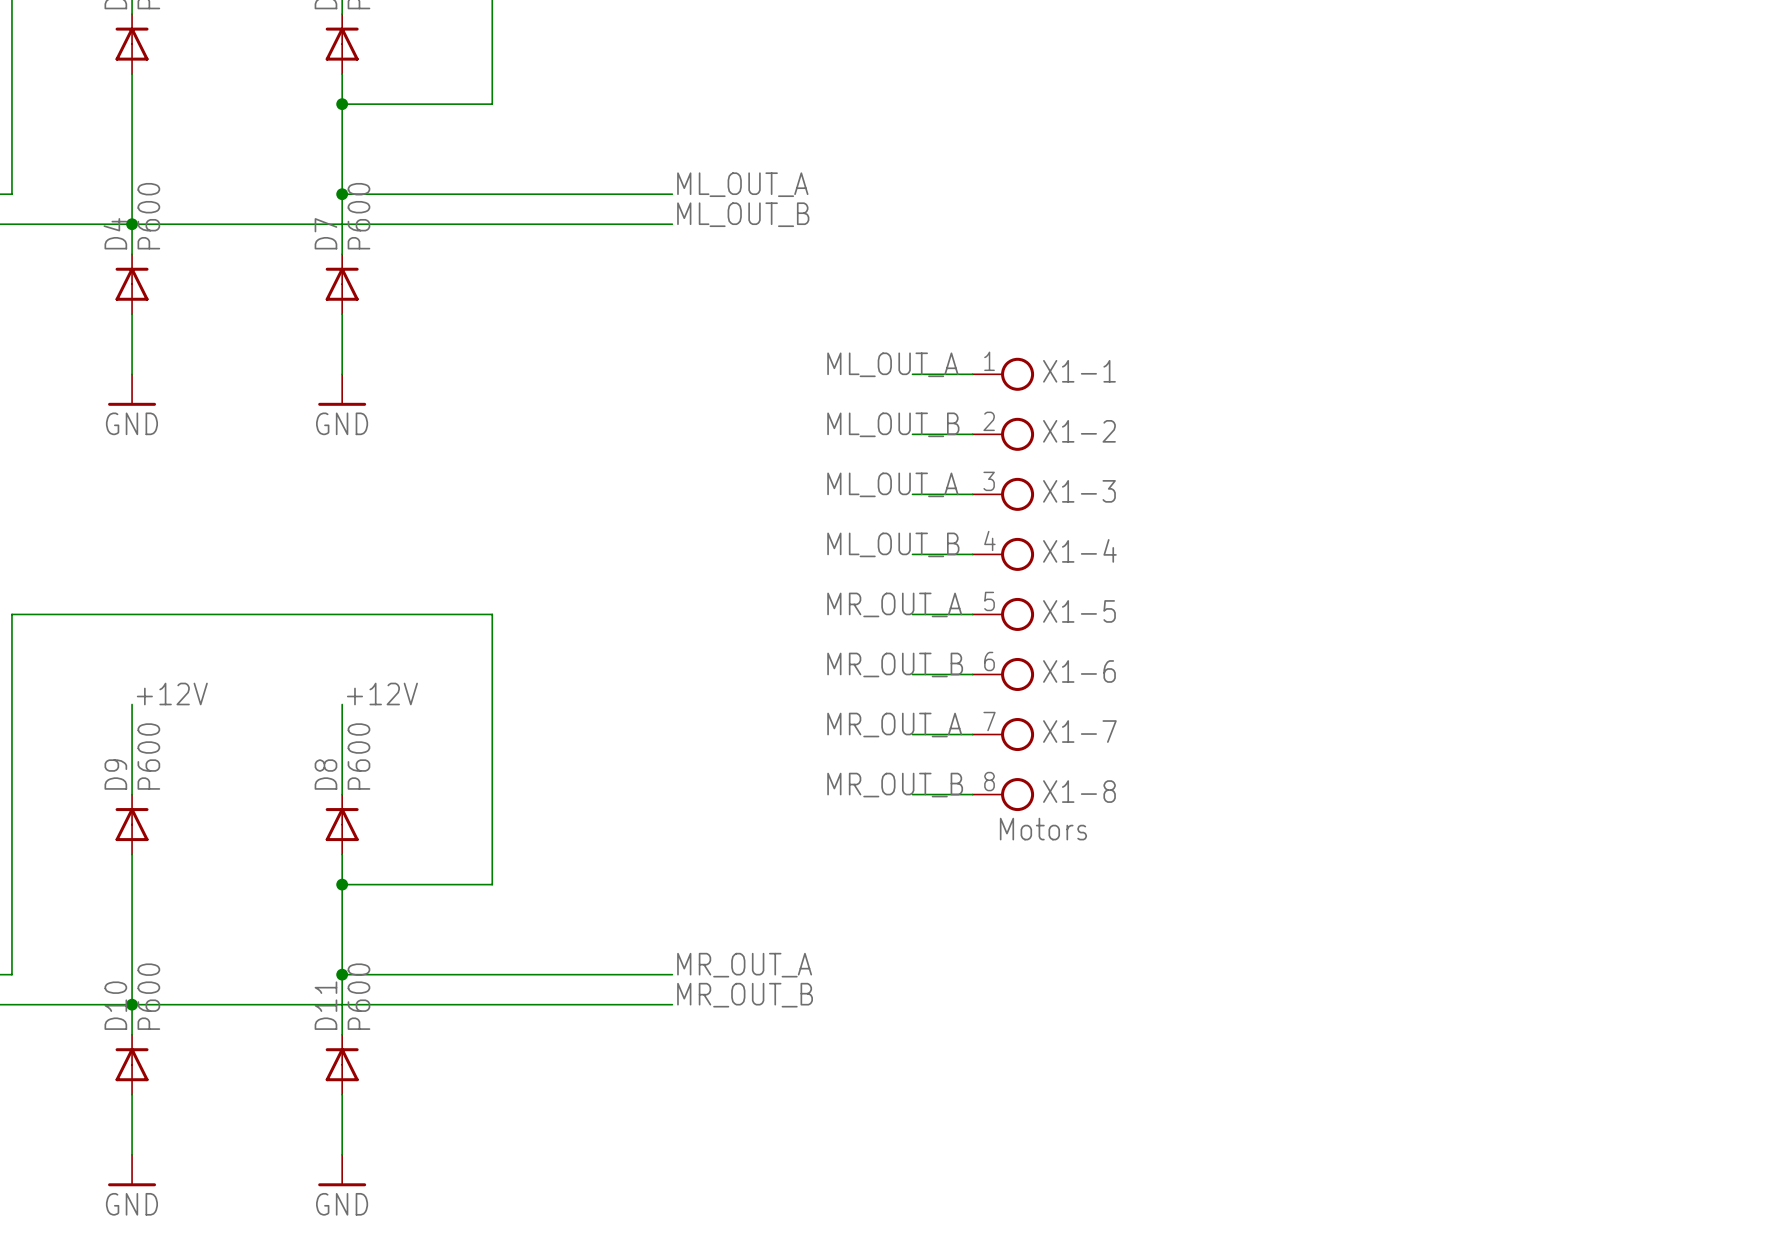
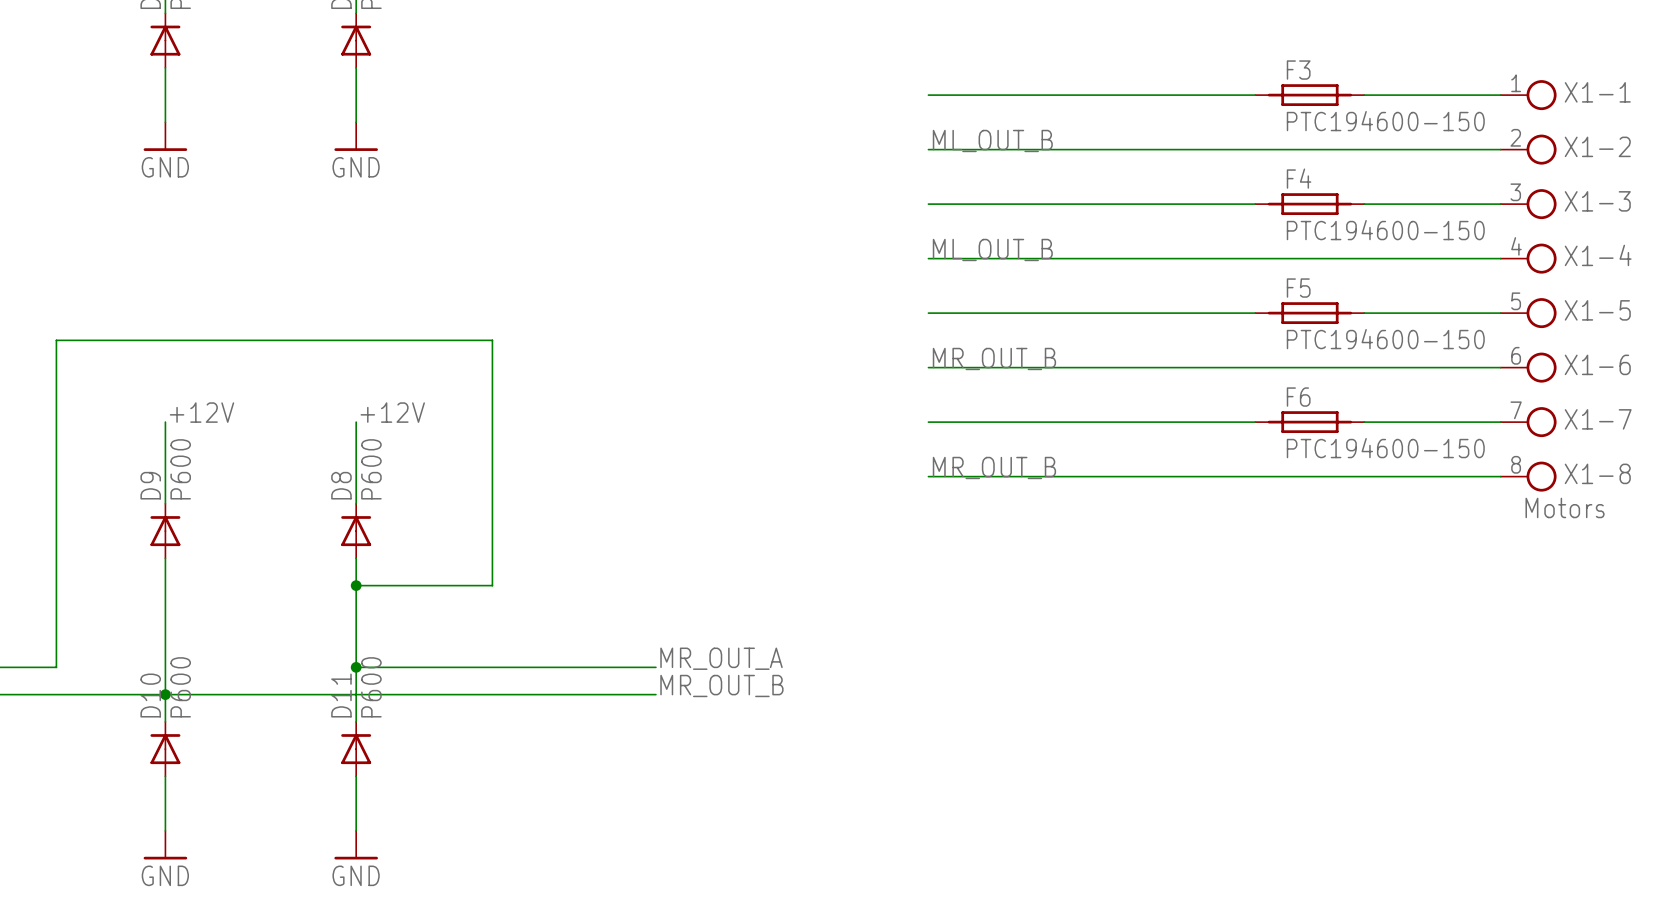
wire: none -> (928, 95) (1255, 95)
F3: none -> PTC194600-150 (1309, 95)
wire: none -> (1364, 95) (1500, 95)
label: ML_OUT_A (892, 364) -> none
wire: (912, 374) (972, 374) -> none
X1-1 position: (1003, 374) -> (1528, 95)
label: none -> ML_OUT_B (992, 140)
wire: none -> (928, 149) (1500, 149)
label: ML_OUT_B (893, 424) -> none
wire: (912, 434) (972, 434) -> none
X1-2 position: (1003, 434) -> (1528, 149)
wire: none -> (928, 204) (1255, 204)
F4: none -> PTC194600-150 (1309, 204)
wire: none -> (1364, 204) (1500, 204)
label: ML_OUT_A (892, 484) -> none
wire: (912, 494) (972, 494) -> none
X1-3 position: (1003, 494) -> (1528, 204)
label: none -> ML_OUT_B (992, 249)
wire: none -> (928, 258) (1500, 258)
label: ML_OUT_B (893, 544) -> none
wire: (912, 554) (972, 554) -> none
X1-4 position: (1003, 554) -> (1528, 258)
wire: none -> (928, 313) (1255, 313)
F5: none -> PTC194600-150 (1309, 313)
wire: none -> (1364, 313) (1500, 313)
label: MR_OUT_A (894, 604) -> none
wire: (912, 614) (972, 614) -> none
X1-5 position: (1003, 614) -> (1528, 313)
label: none -> MR_OUT_B (994, 358)
wire: none -> (928, 367) (1500, 367)
label: MR_OUT_B (895, 664) -> none
wire: (912, 674) (972, 674) -> none
X1-6 position: (1003, 674) -> (1528, 367)
wire: none -> (928, 422) (1255, 422)
F6: none -> PTC194600-150 (1309, 422)
wire: none -> (1364, 422) (1500, 422)
label: MR_OUT_A (894, 725) -> none
wire: (912, 734) (972, 734) -> none
X1-7 position: (1003, 734) -> (1528, 422)
label: none -> MR_OUT_B (994, 467)
wire: none -> (928, 476) (1500, 476)
label: MR_OUT_B (895, 785) -> none
wire: (912, 794) (972, 794) -> none
X1-8 position: (1003, 794) -> (1528, 476)

